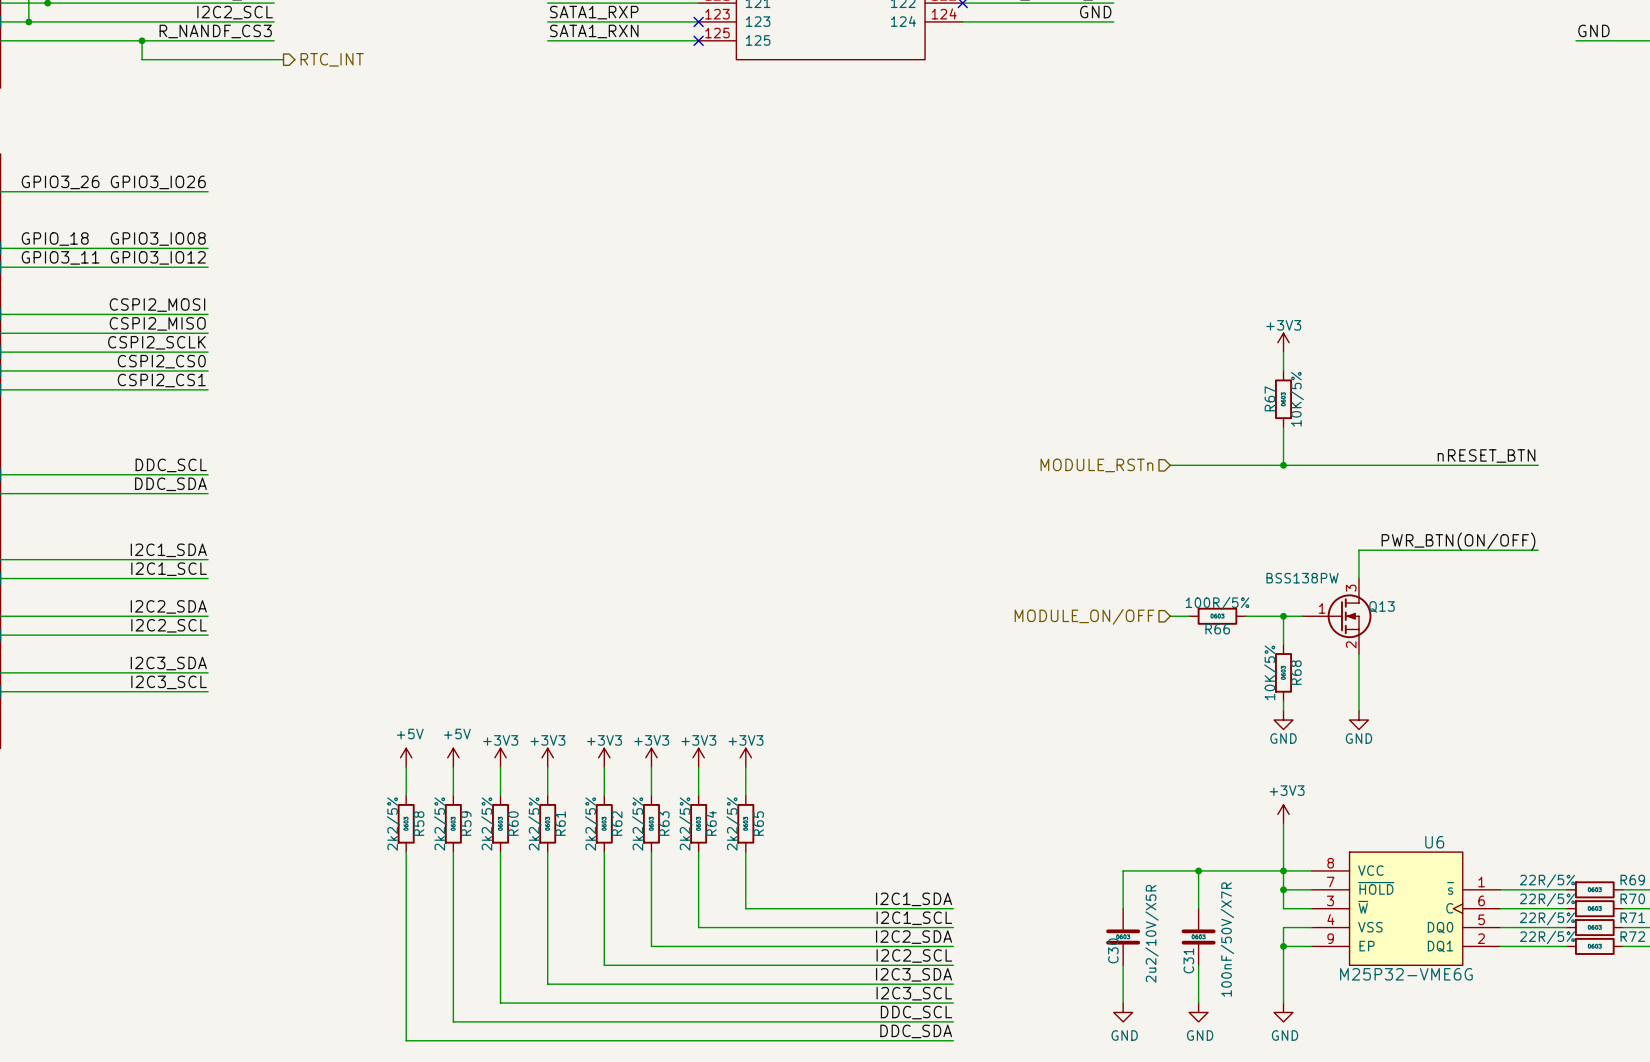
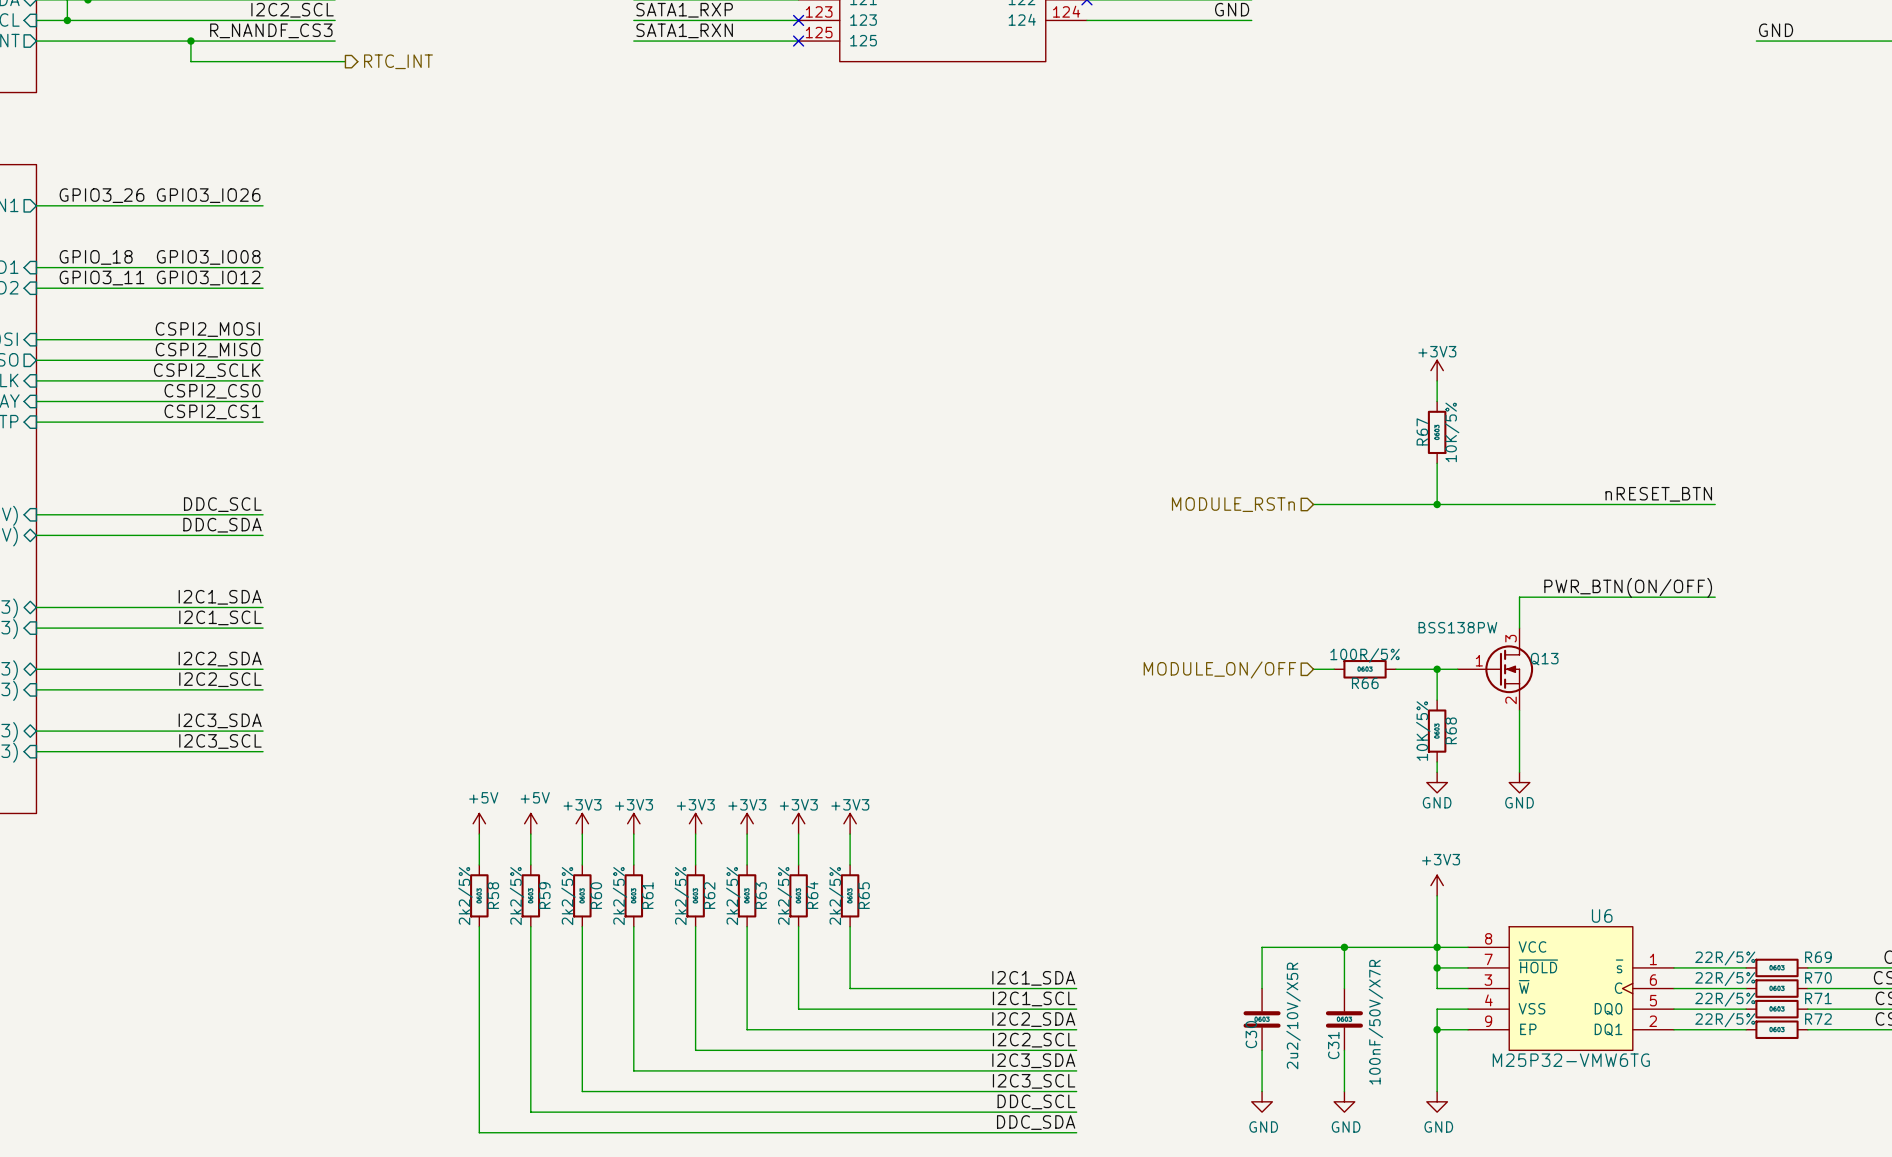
U6 value: M25P32-VME6G (1406, 974) -> M25P32-VMW6TG (1571, 1060)

